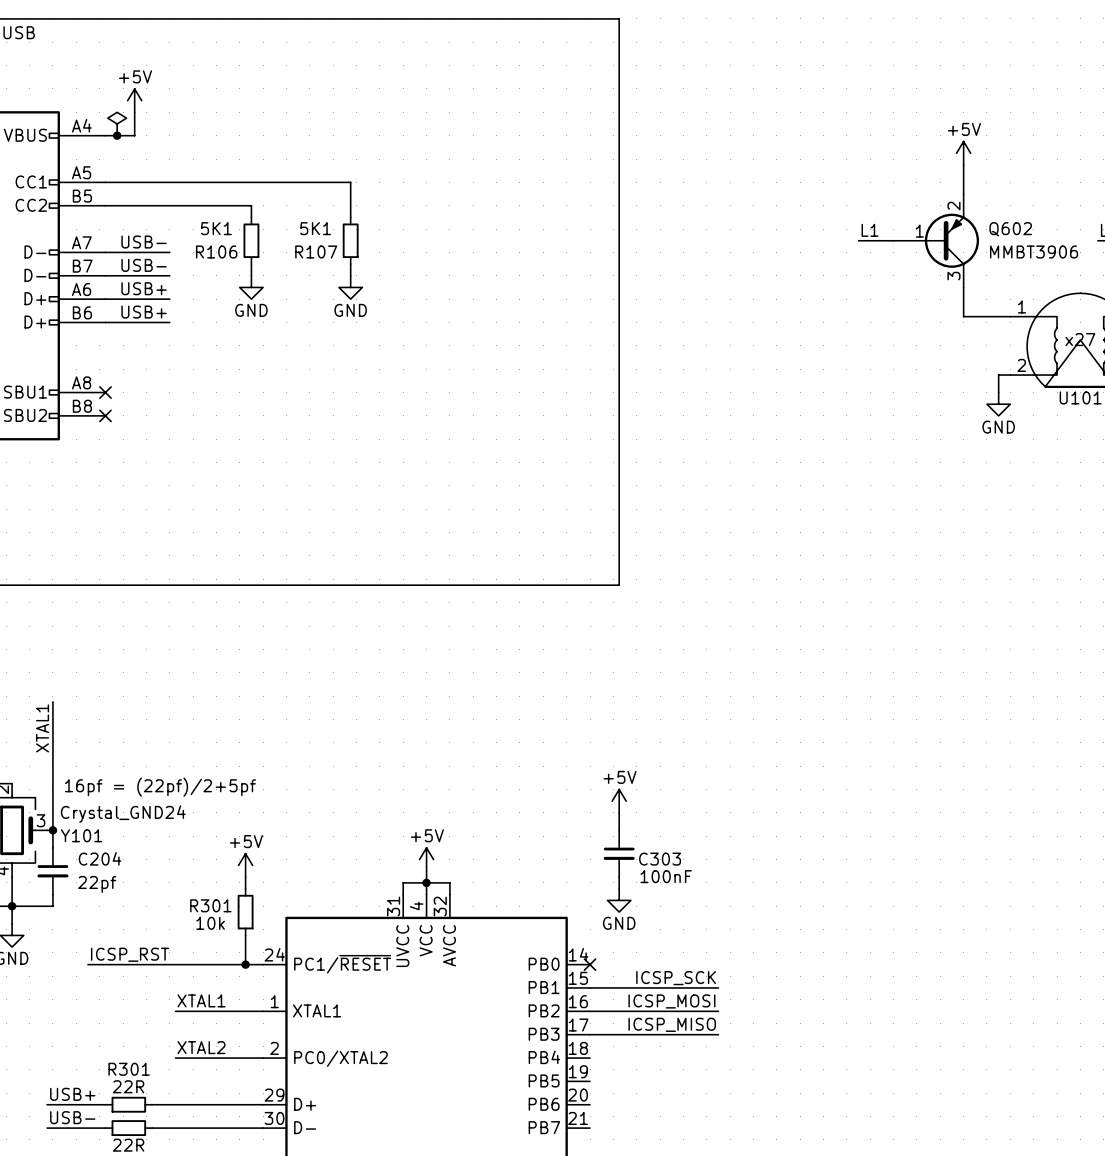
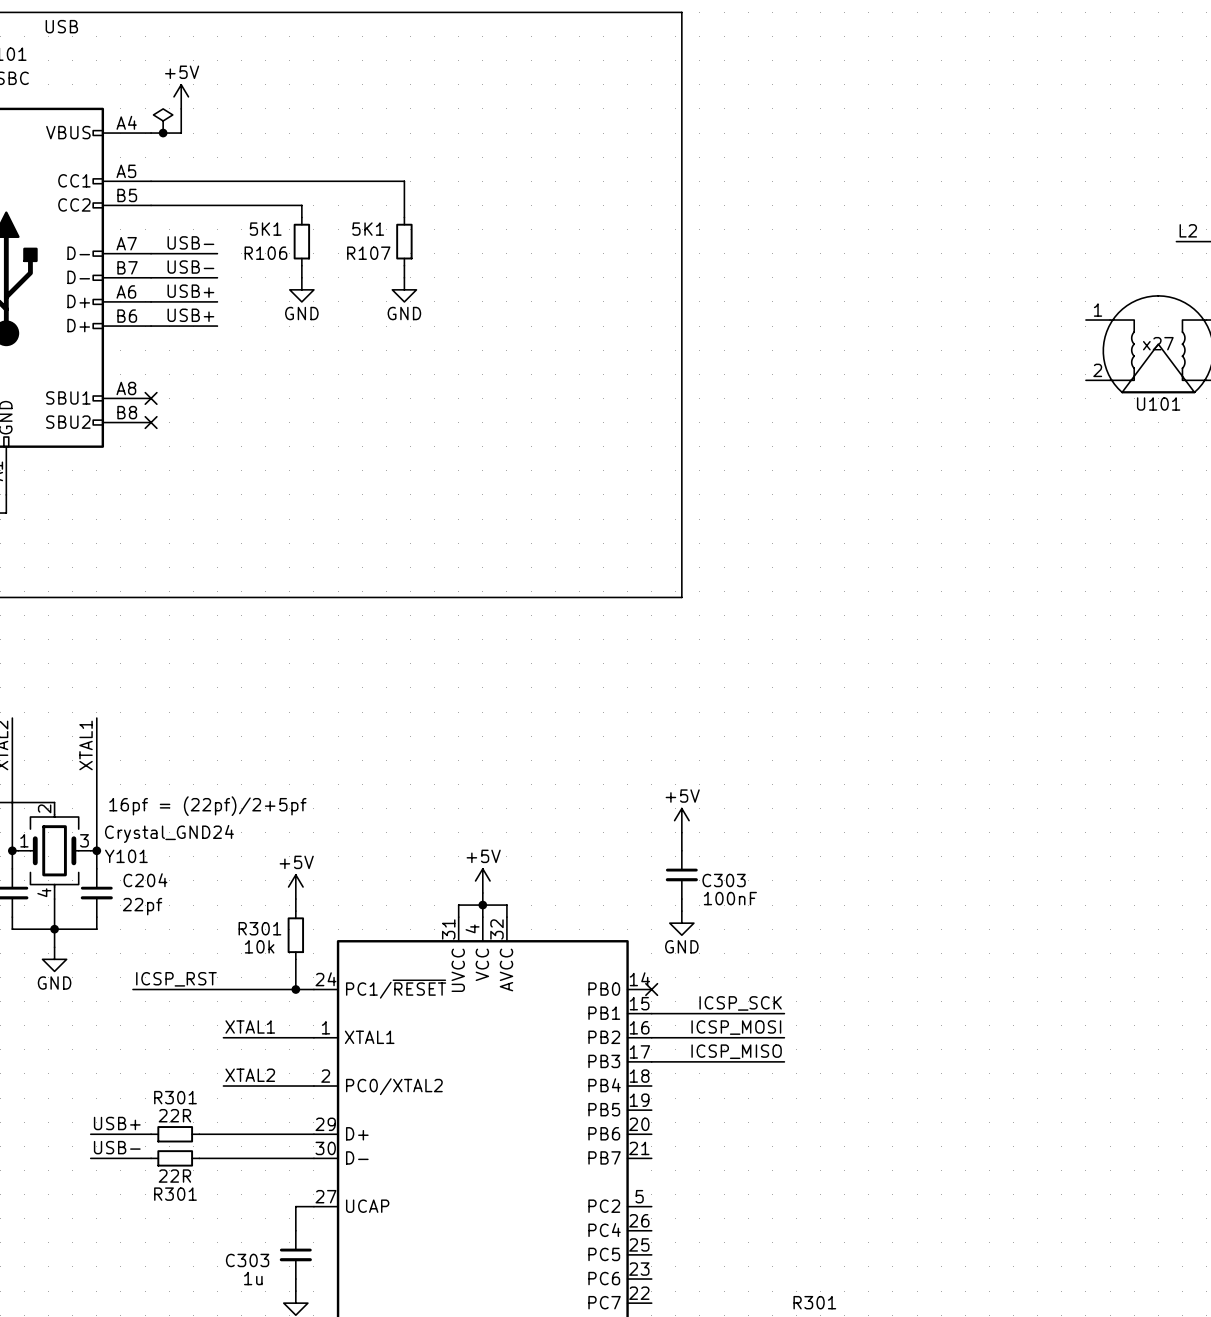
power symbol: +5V (963, 153) -> none
wire: (963, 164) (963, 194) -> none
label: L1 (870, 230) -> none
wire: (858, 240) (893, 240) -> none
Q602: MMBT3906 (936, 240) -> none
wire: (963, 287) (963, 316) (1010, 316) -> none
wire: (1010, 375) (998, 375) (998, 392) -> none
power symbol: GND (998, 404) -> none

